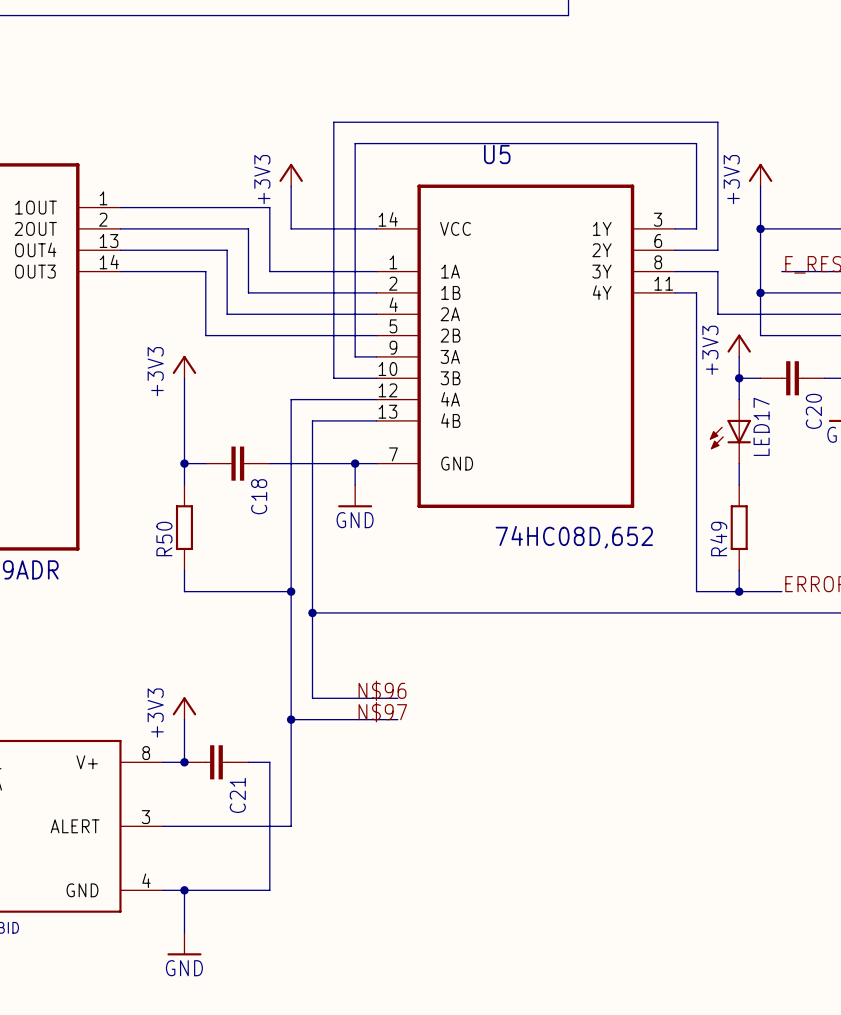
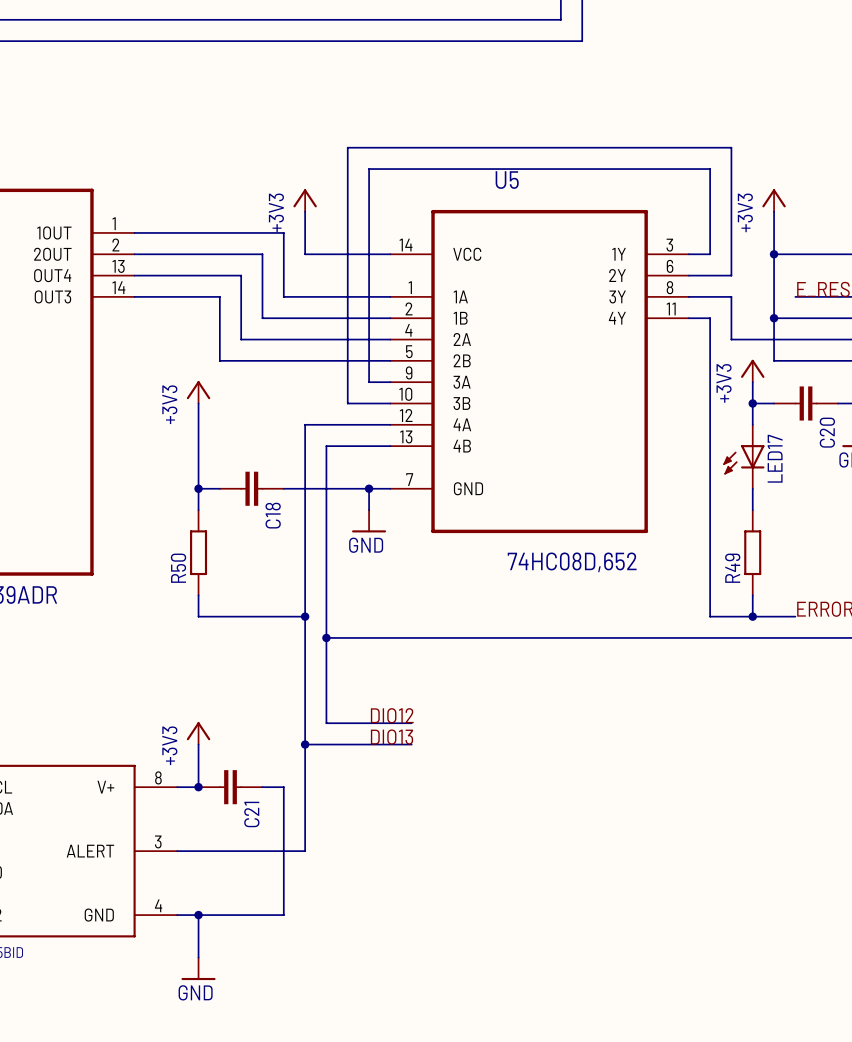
label: N$96 (382, 690) -> DIO12 (392, 715)
label: N$97 (382, 712) -> DIO13 (392, 737)

